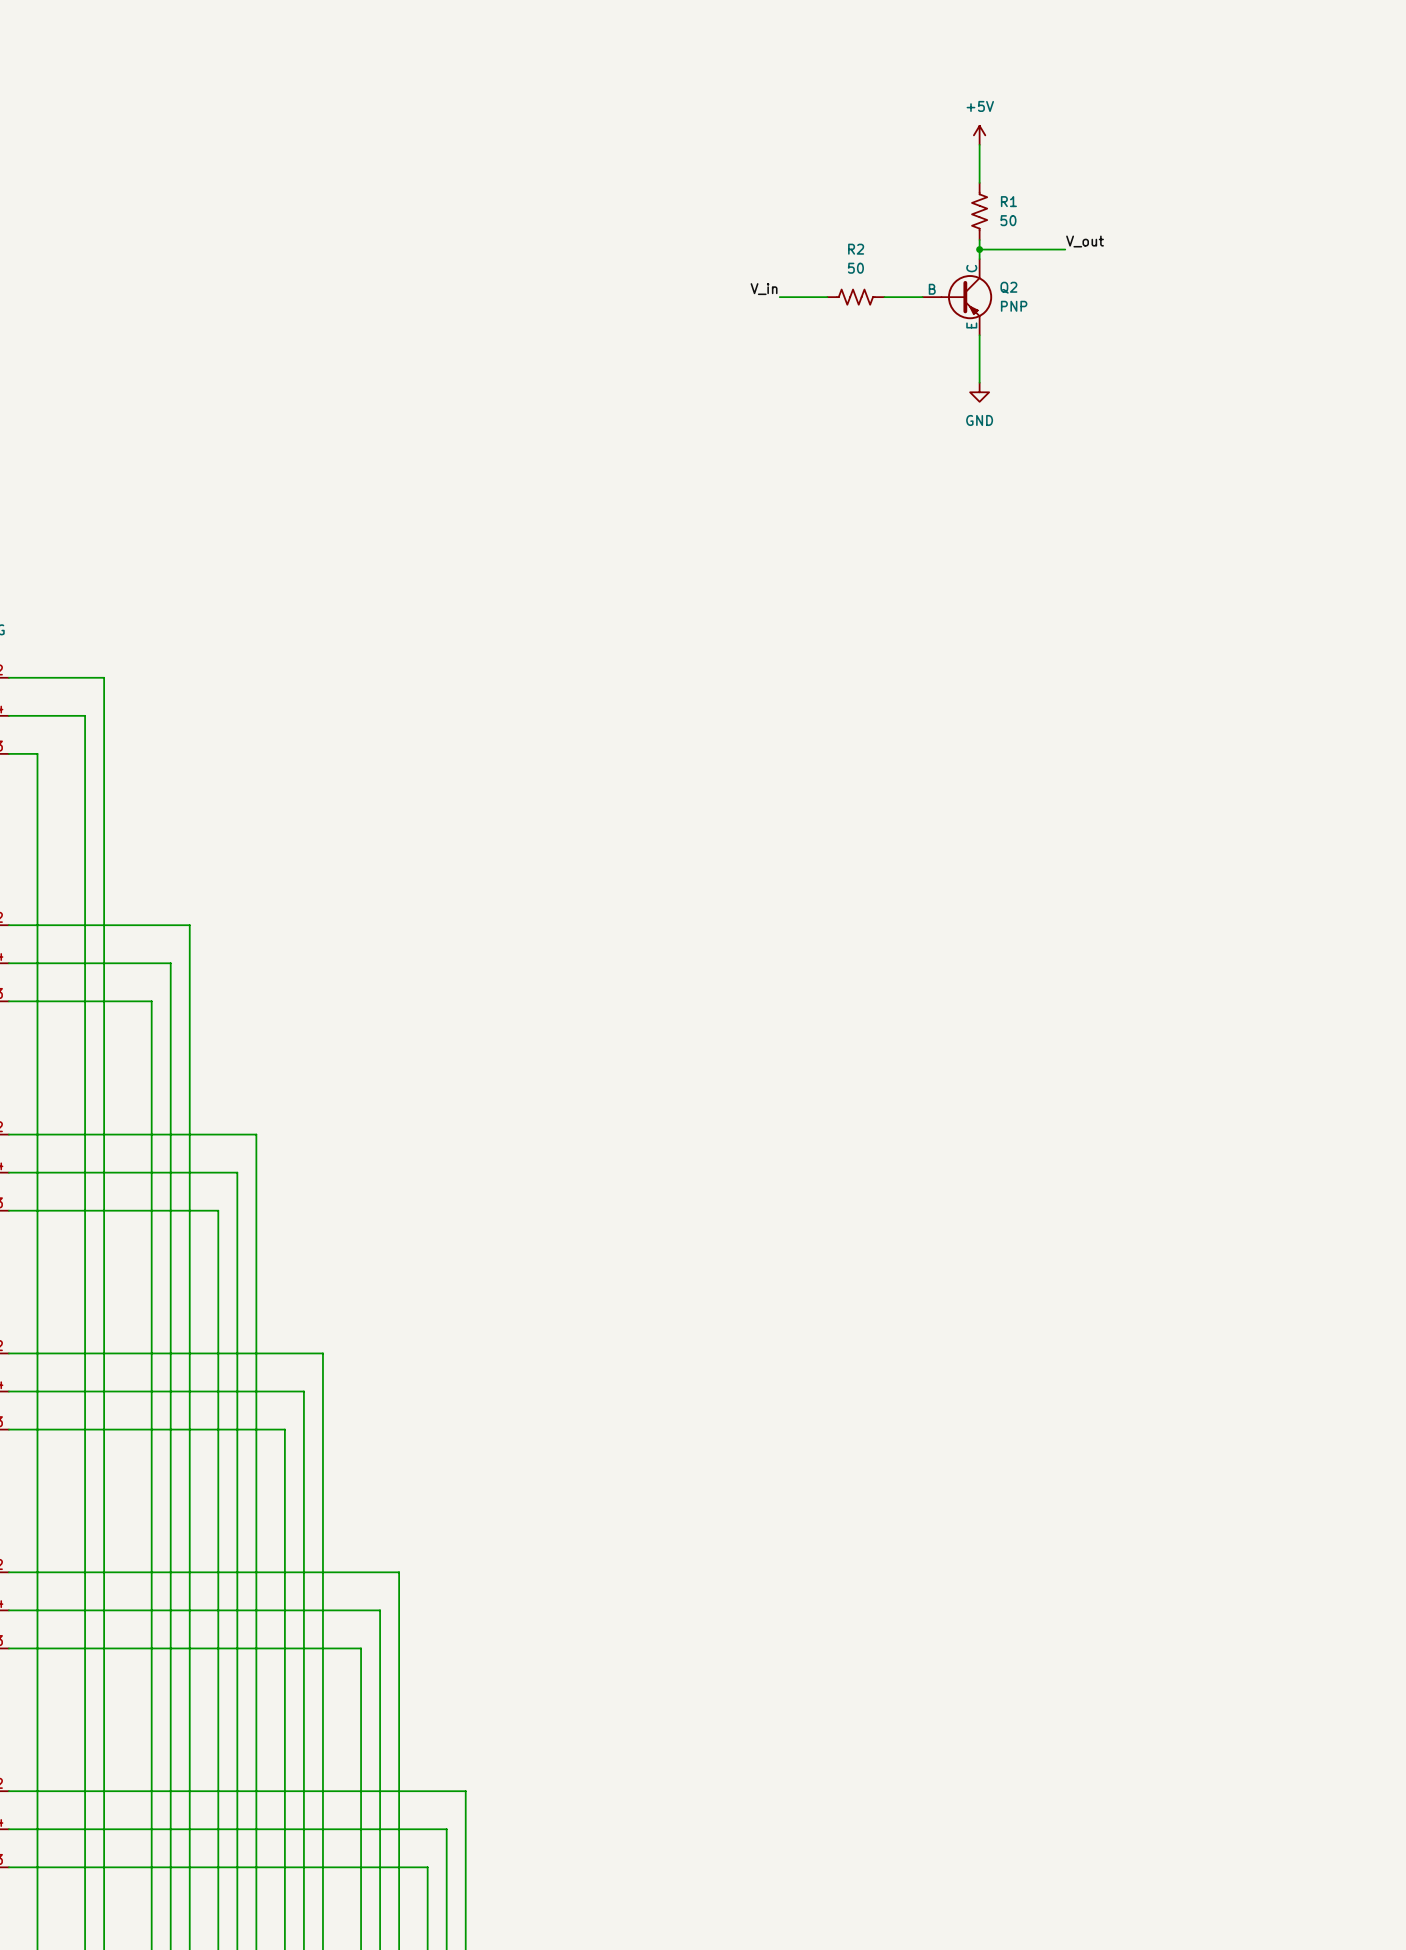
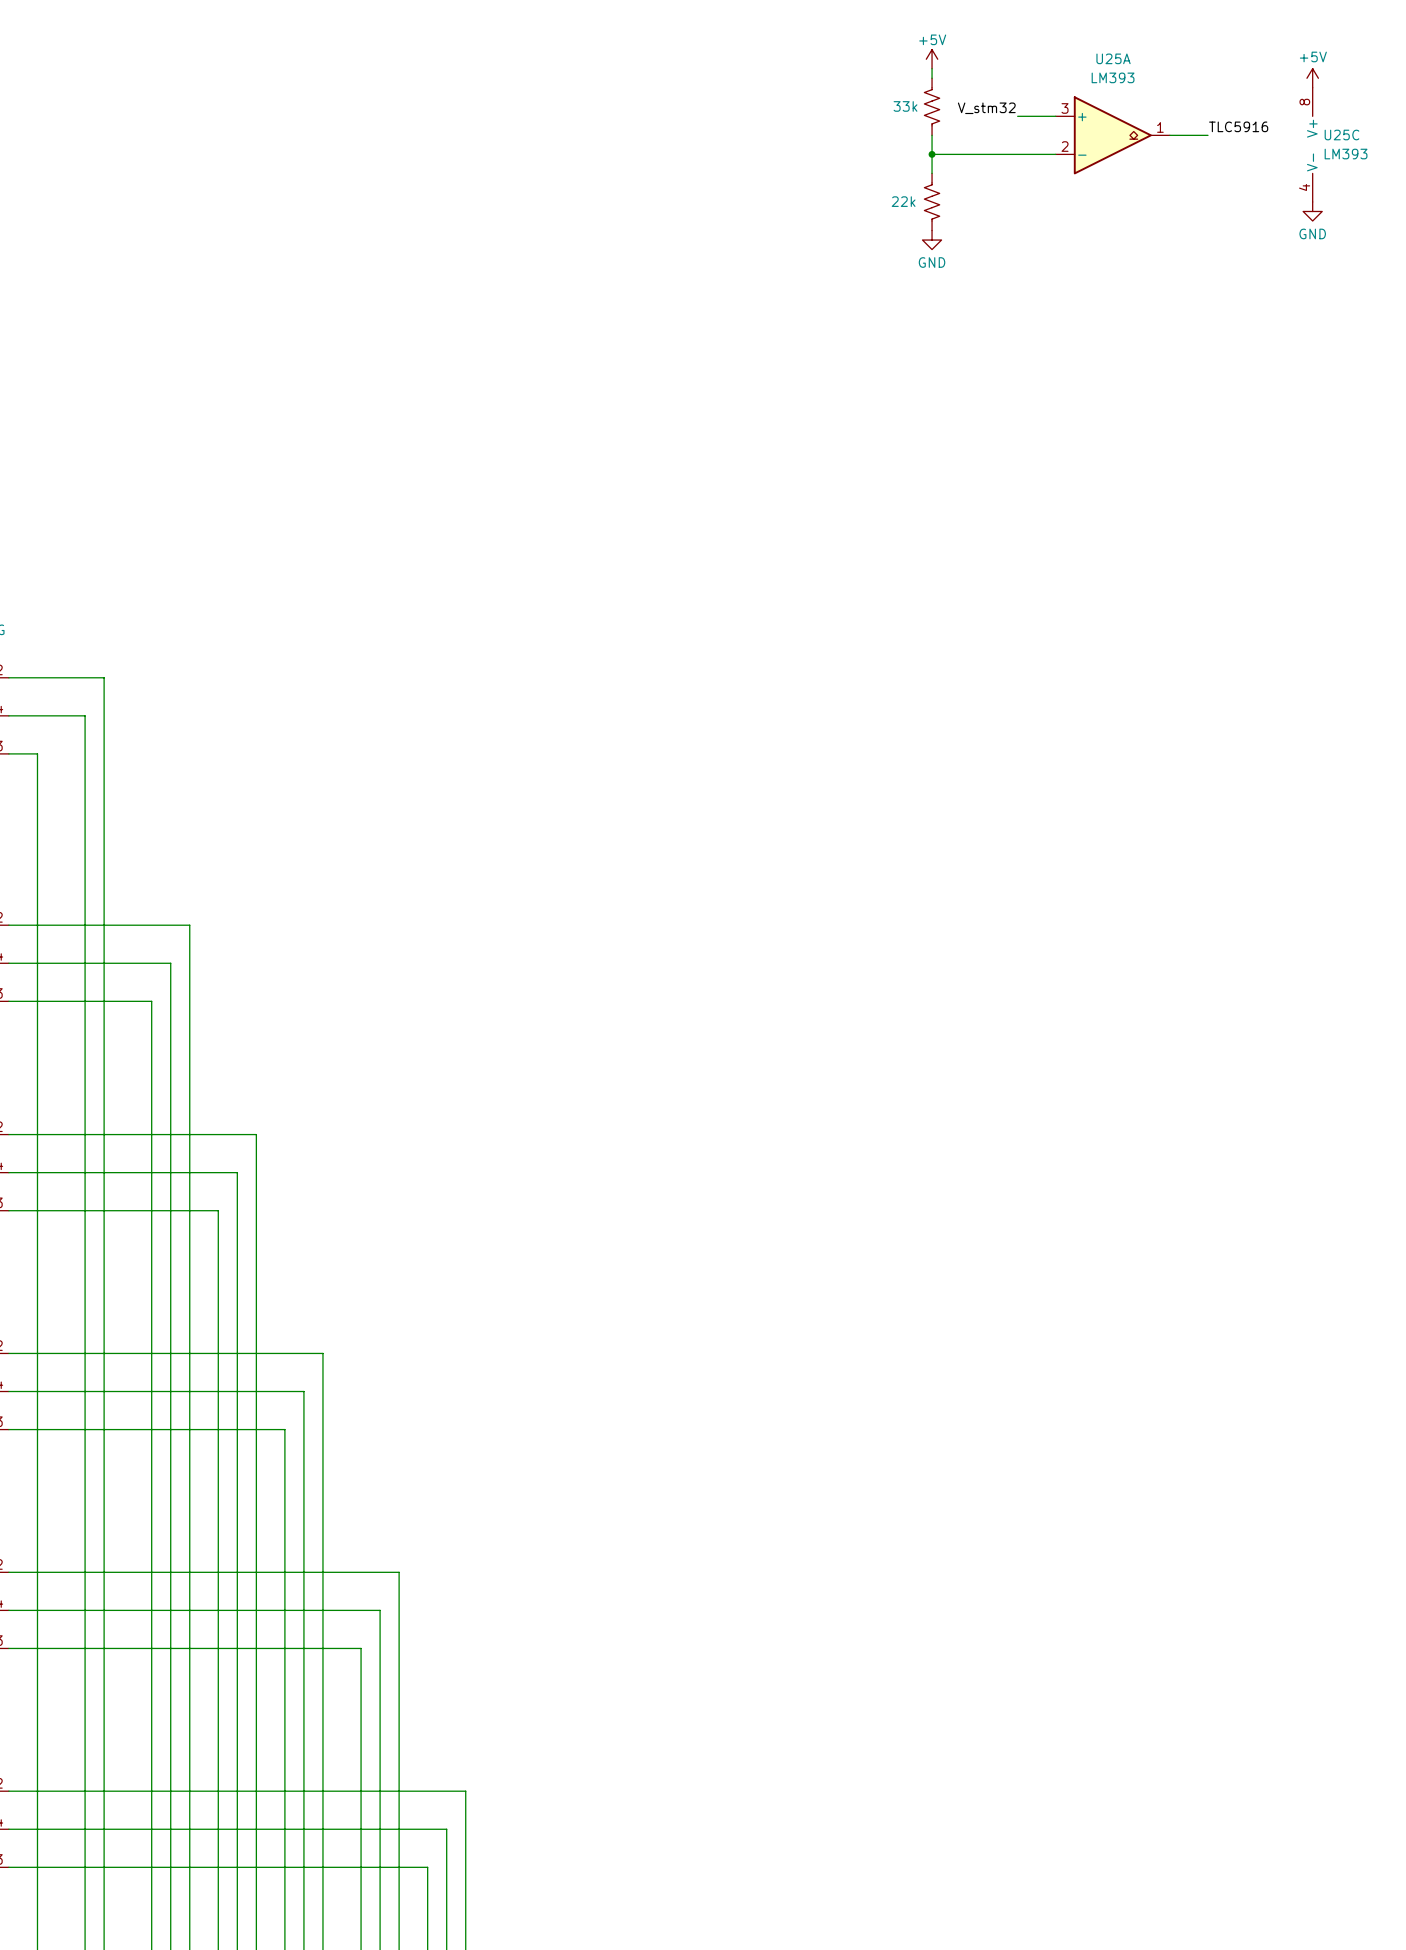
wire: none -> (932, 68) (932, 78)
power symbol: none -> +5V (1312, 78)
part: none -> 33k (932, 106)
power symbol text position: +5V (980, 106) -> +5V (932, 39)
label: none -> V_stm32 (986, 108)
wire: none -> (1017, 116) (1055, 116)
label: none -> TLC5916 (1238, 126)
power symbol position: +5V (979, 135) -> +5V (932, 59)
U25A: none -> LM393 (1112, 135)
wire: none -> (1169, 135) (1208, 135)
wire: (979, 144) (979, 182) -> (932, 135) (932, 173)
U25C: none -> LM393 (1312, 144)
wire: none -> (932, 154) (1055, 154)
junction: none -> (932, 154)
part: none -> 22k (932, 201)
R1: 50 (979, 211) -> none
power symbol: none -> GND (1312, 211)
wire: (979, 240) (979, 259) -> none
label: V_out (1085, 241) -> none
wire: (979, 249) (1065, 249) -> none
junction: (979, 249) -> none
label: V_in (764, 289) -> none
wire: (779, 297) (827, 297) -> none
R2: 50 (855, 297) -> none
wire: (884, 297) (922, 297) -> none
Q2: PNP (957, 297) -> none
wire: (979, 335) (979, 382) -> none
power symbol position: GND (979, 392) -> GND (932, 240)
power symbol text position: GND (979, 420) -> GND (932, 262)

